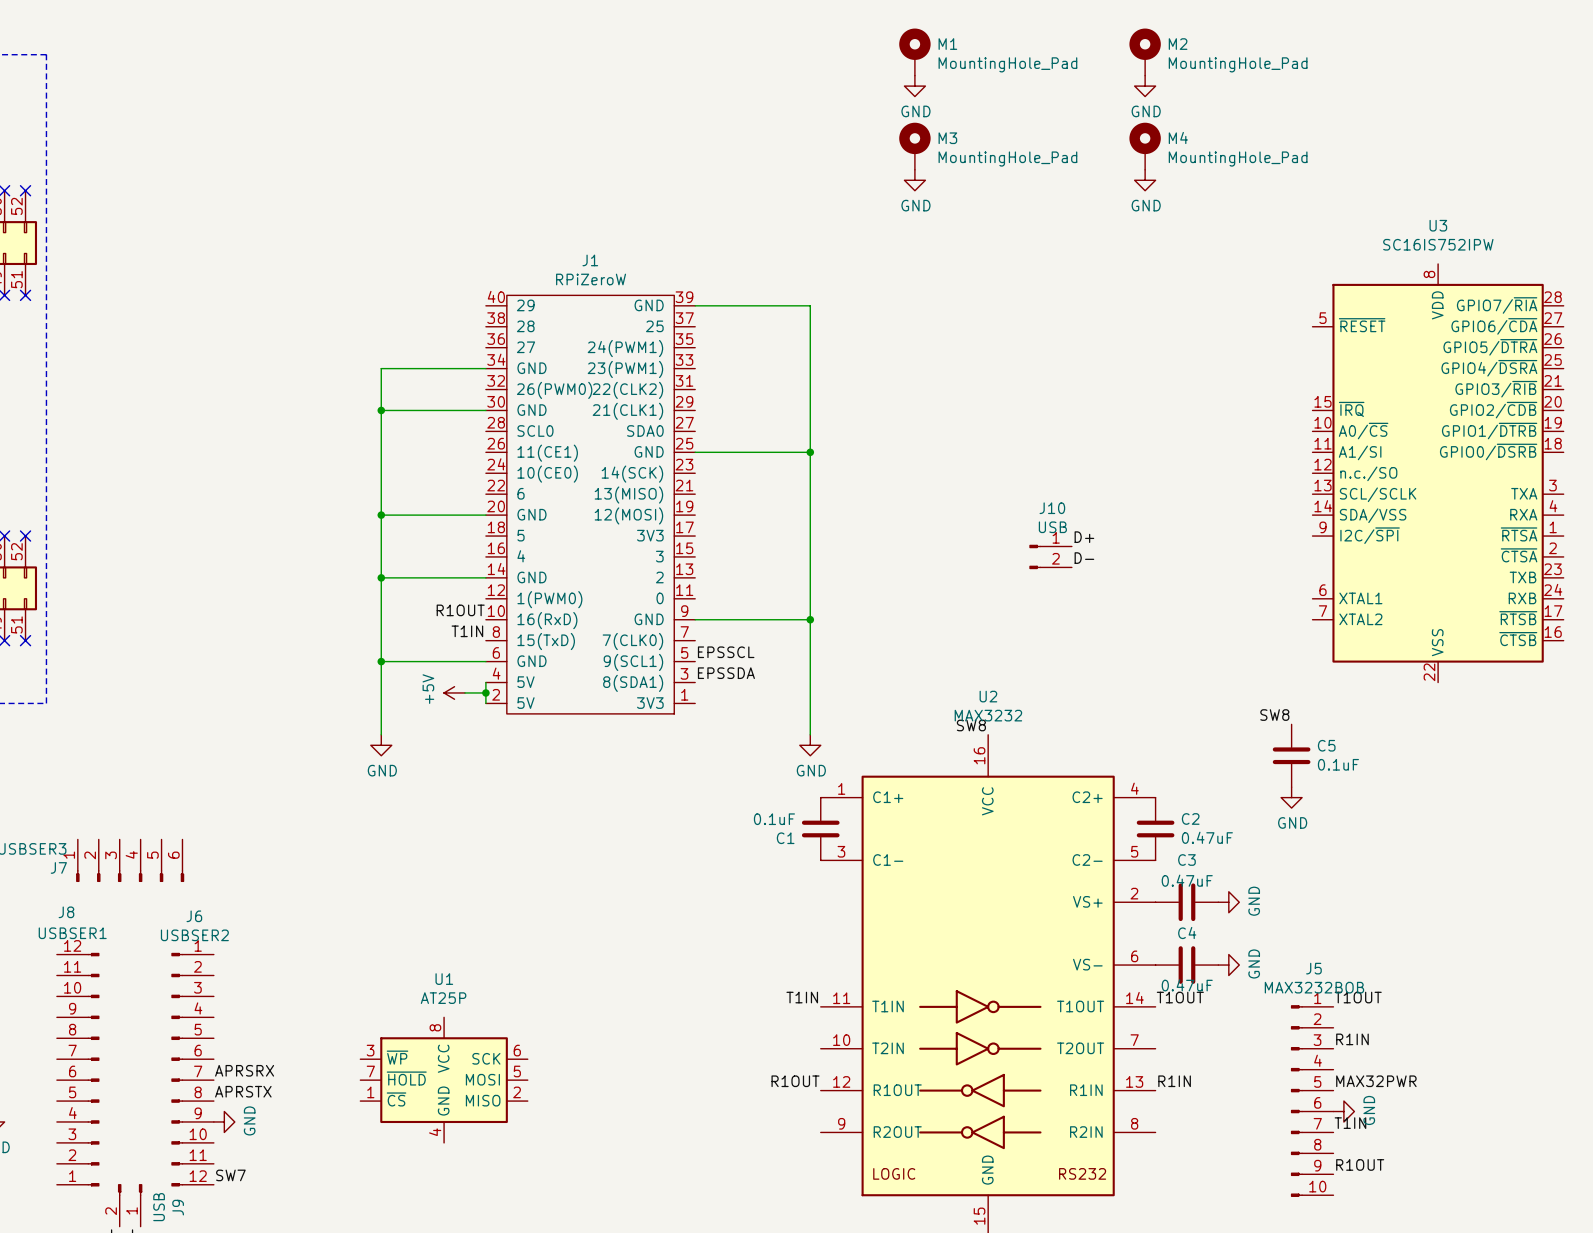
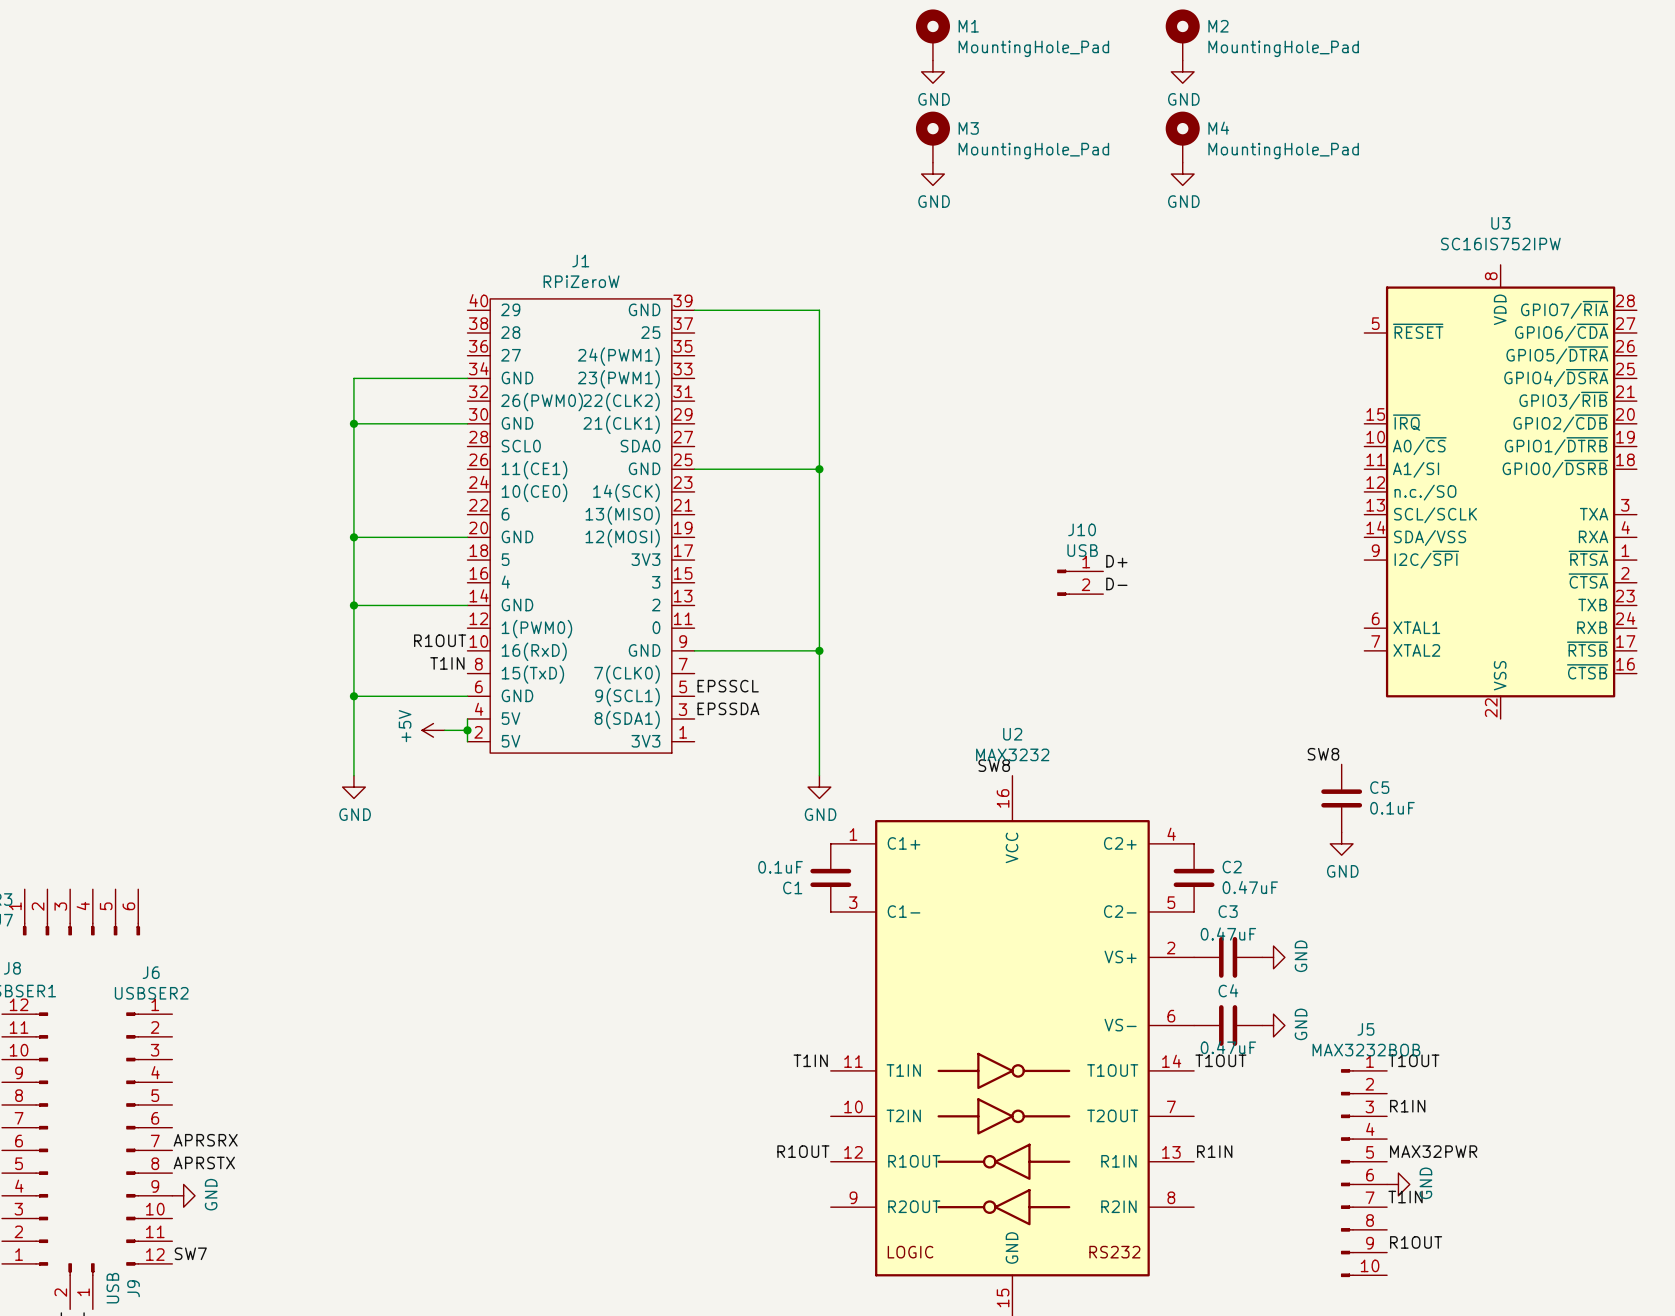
U1: AT25P (444, 1080) -> none

